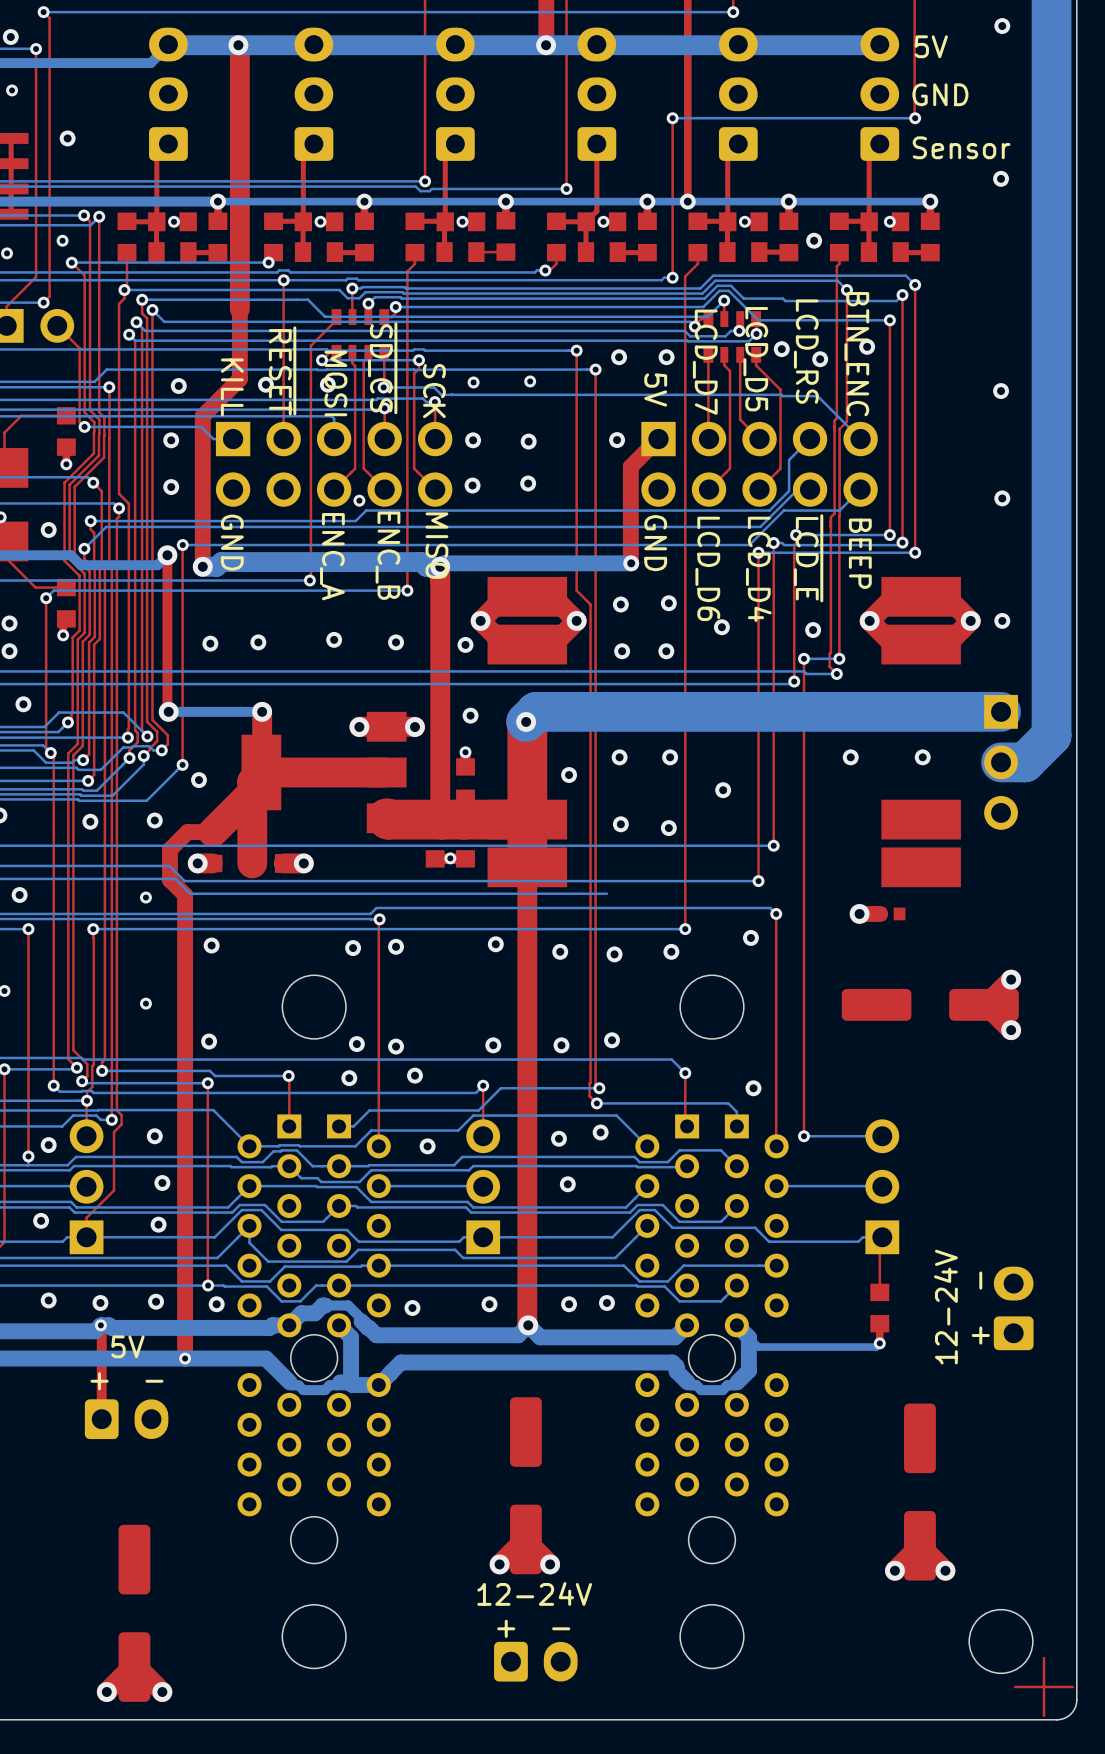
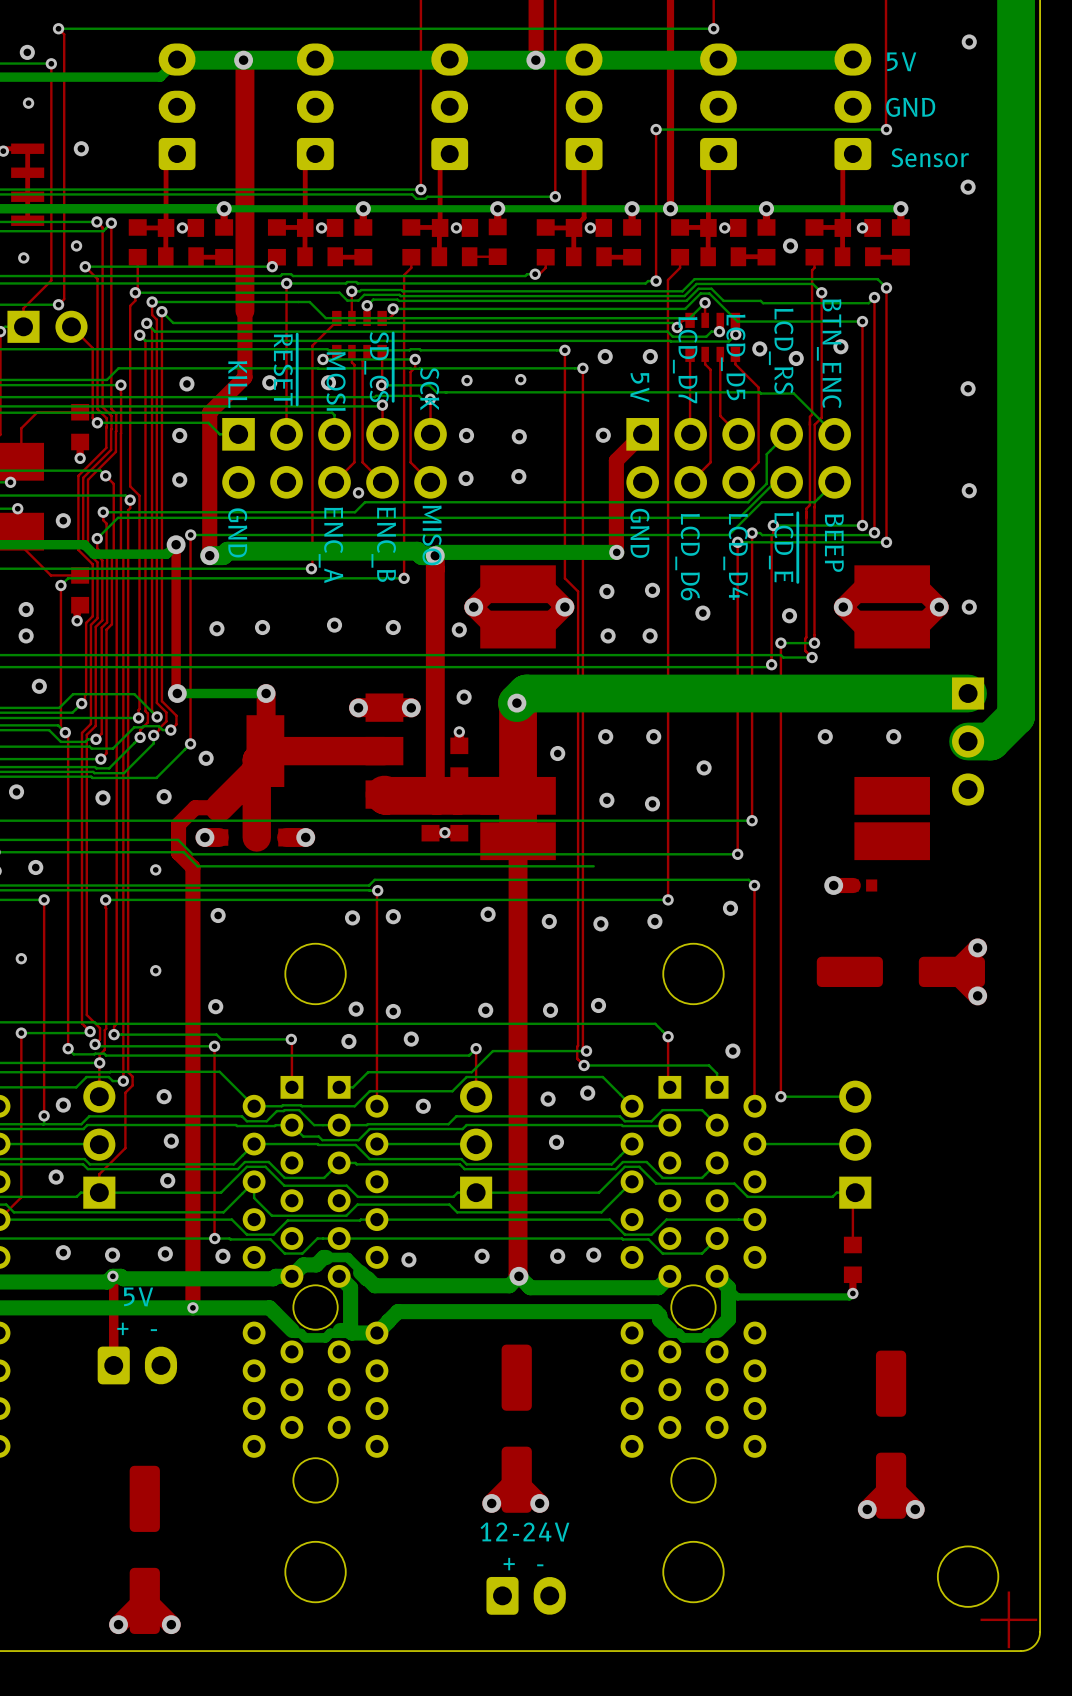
text: 12-24V (945, 1307) -> none
text: + - (980, 1308) -> none
part: (1013, 1308) -> none

